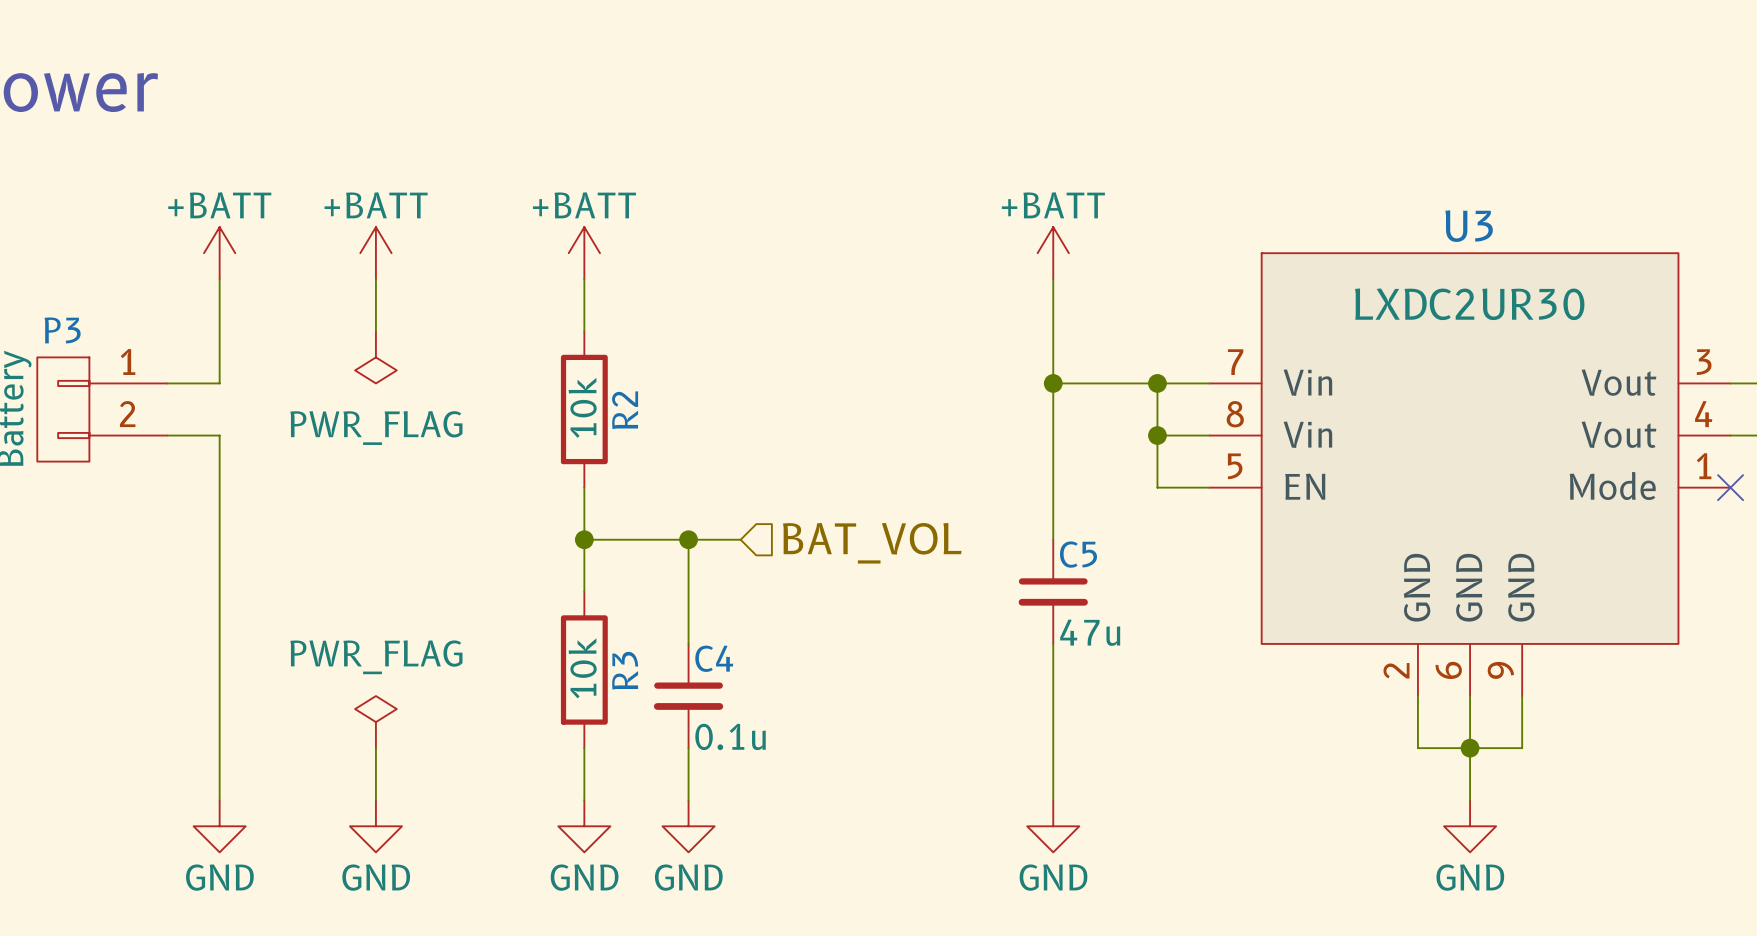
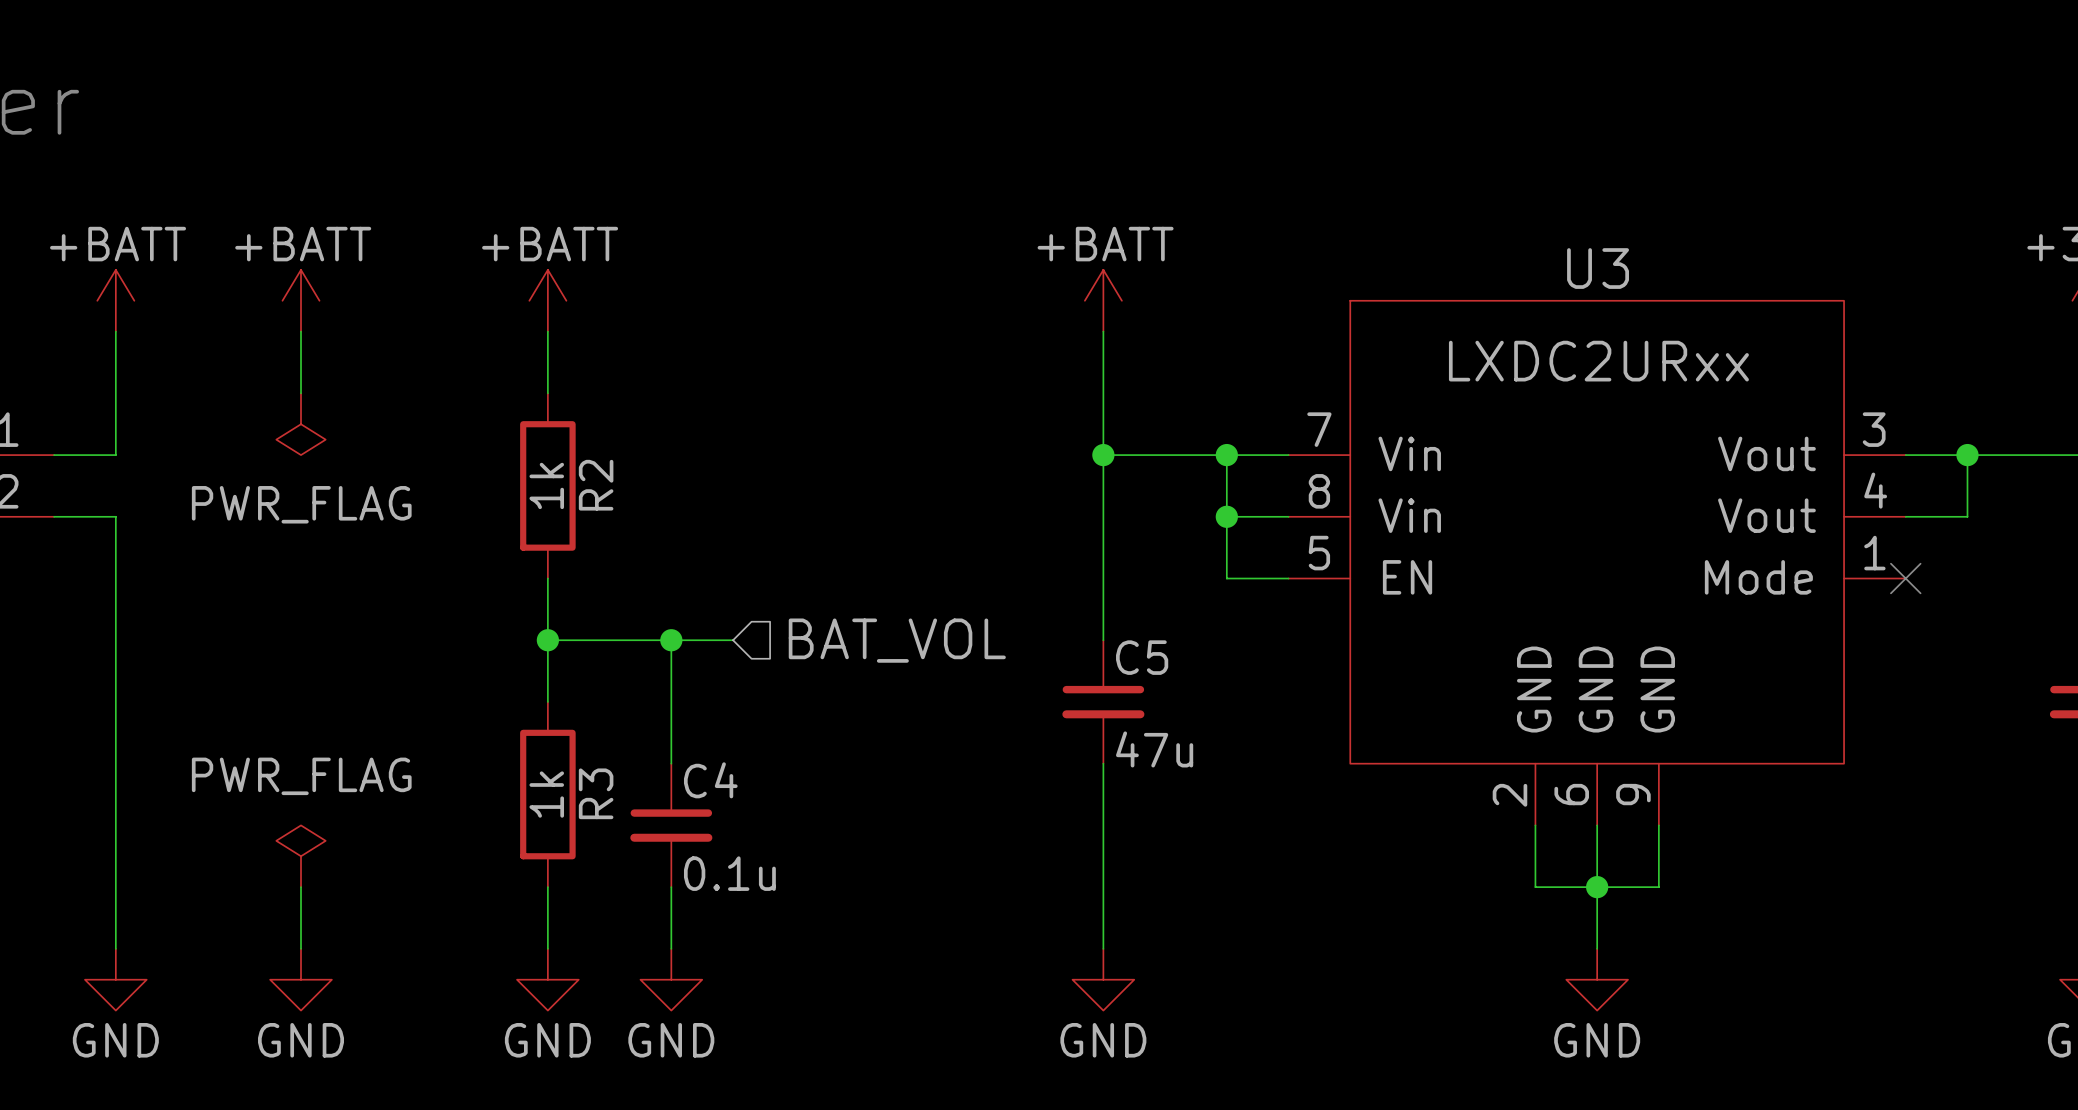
U3 value: LXDC2UR30 (1469, 304) -> LXDC2URxx (1598, 361)
R2 value: 10k (582, 407) -> 1k (546, 485)
R3 value: 10k (582, 668) -> 1k (546, 794)

